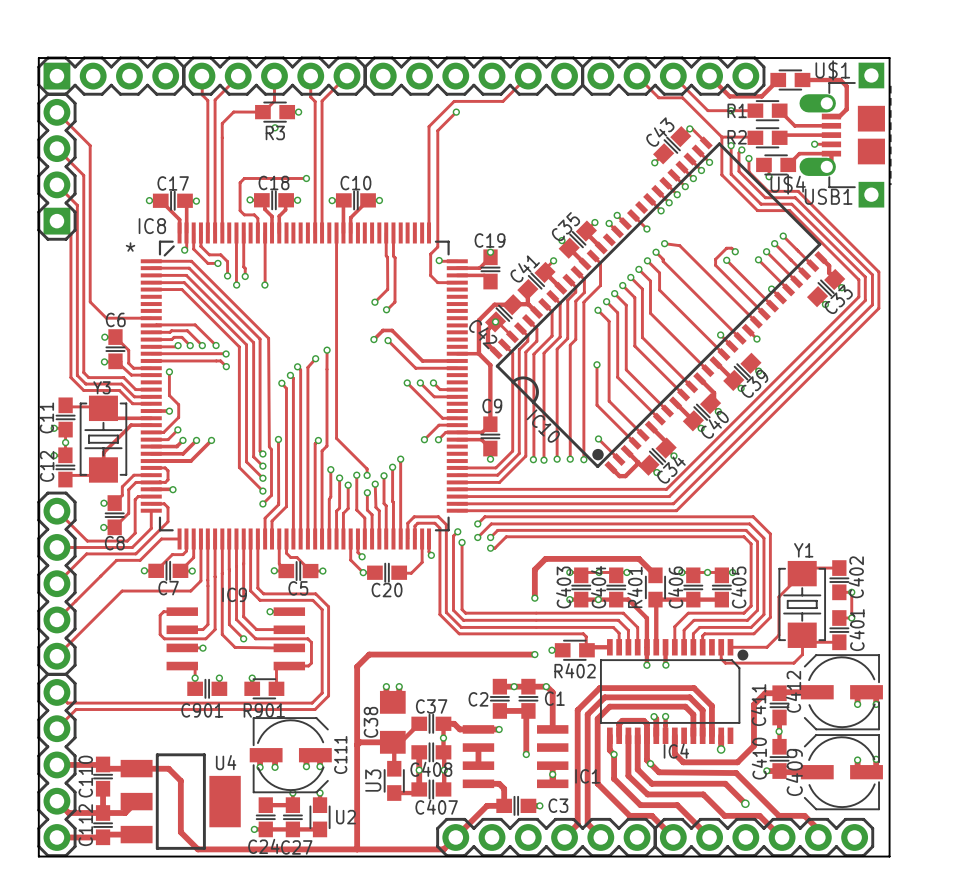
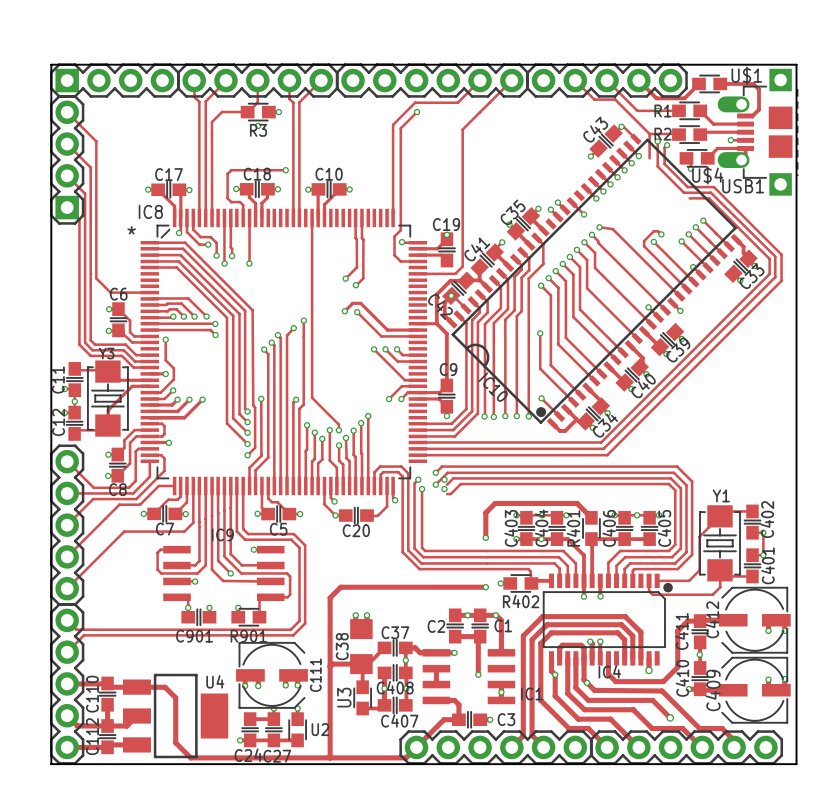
track: none -> (511, 80) (462, 129) (462, 266) (455, 273) (417, 273)
track: (748, 158) (748, 172) (768, 191) (798, 191) (878, 271) (878, 308) (676, 510) (457, 510) -> none
via: (748, 158) -> none
track: (721, 164) (721, 174) (757, 210) (767, 210) -> none
via: none -> (444, 479)
via: (490, 537) -> none
via: none -> (444, 489)
via: (490, 548) -> none

